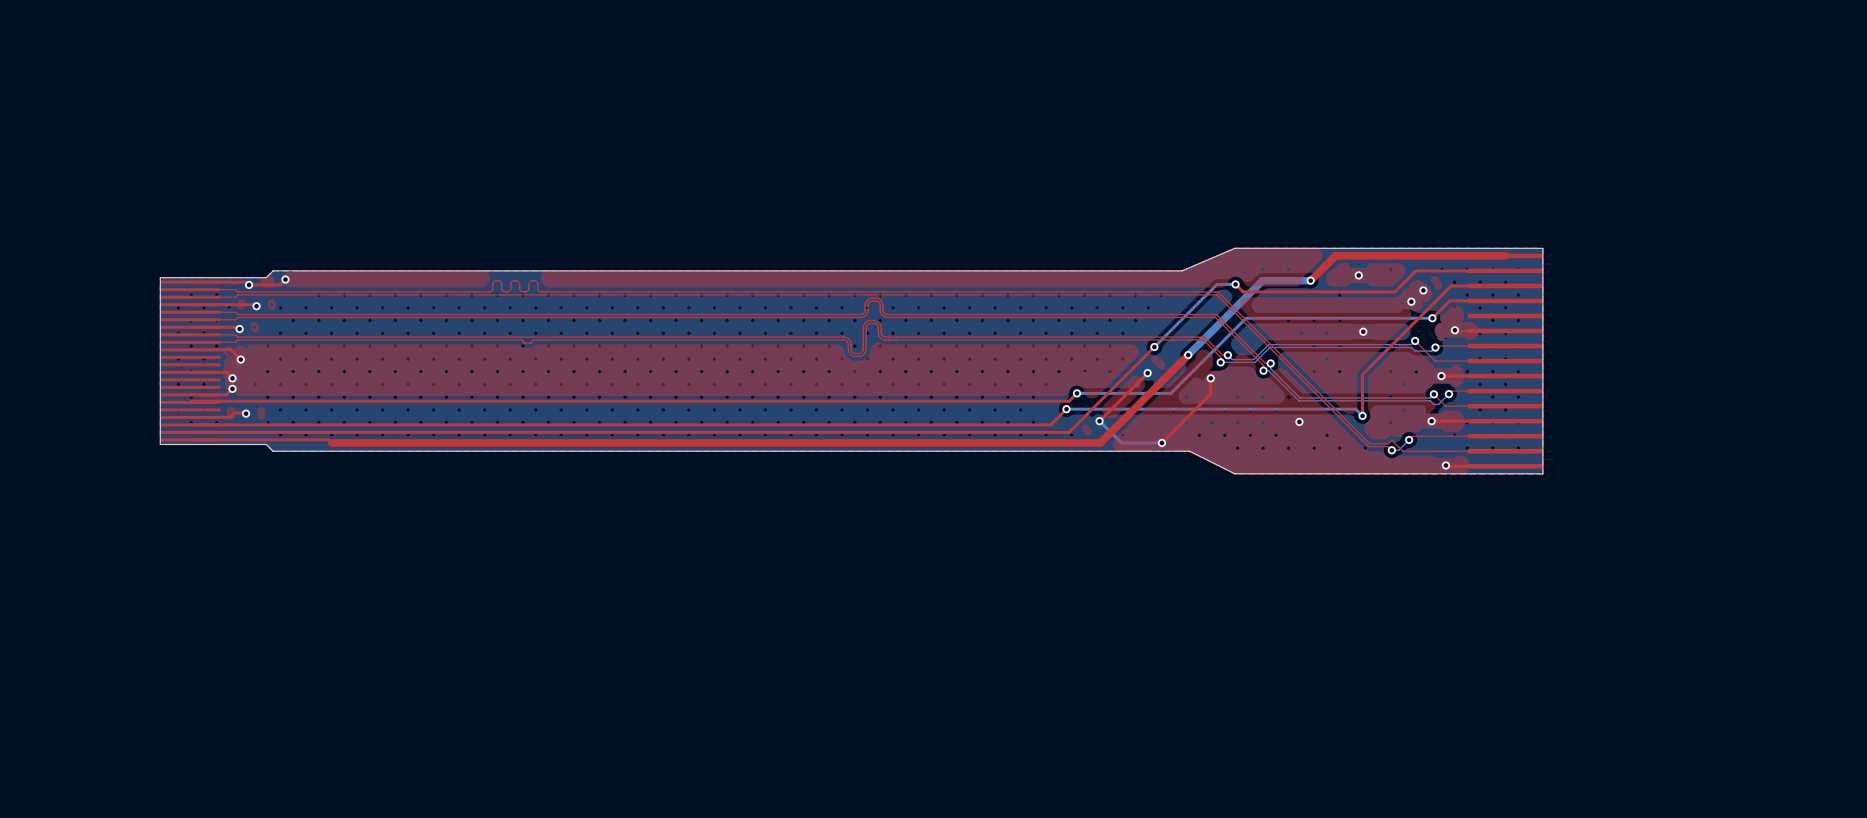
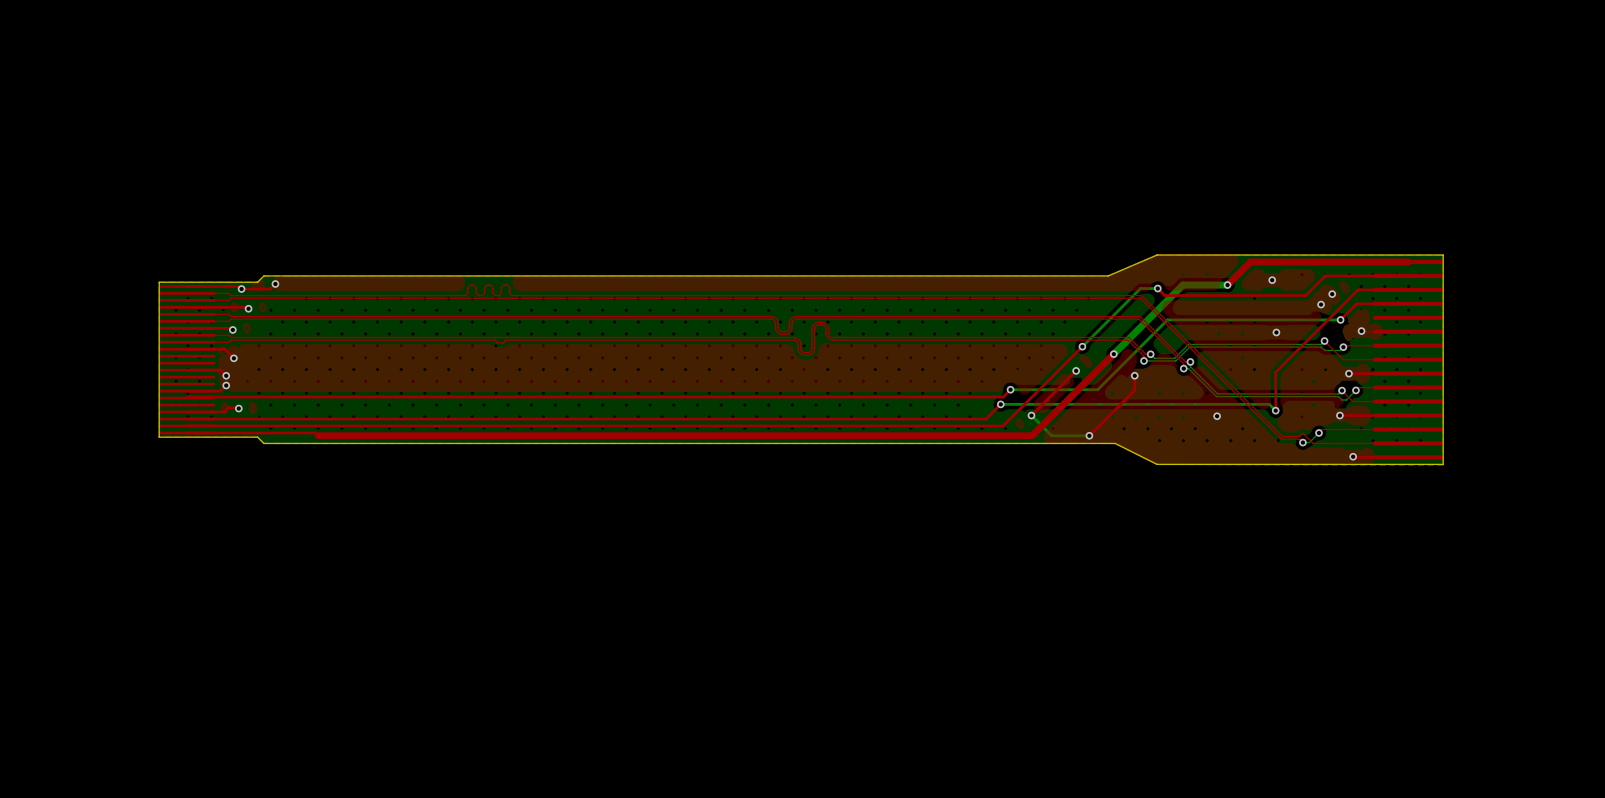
top track: (819, 314) (846, 314) -> (771, 316) (776, 319) (778, 329) (782, 331) (788, 330) (790, 319) (796, 316)
top track: (860, 314) (864, 311) (866, 300) (872, 298) (880, 300) (883, 311) (887, 314) -> (809, 316) (834, 316)
top track: (819, 317) (846, 317) -> (771, 319) (775, 321) (776, 331) (782, 334) (790, 332) (792, 321) (796, 319)
top track: (860, 317) (866, 314) (868, 303) (872, 300) (878, 302) (881, 313) (887, 317) -> (809, 319) (834, 319)

